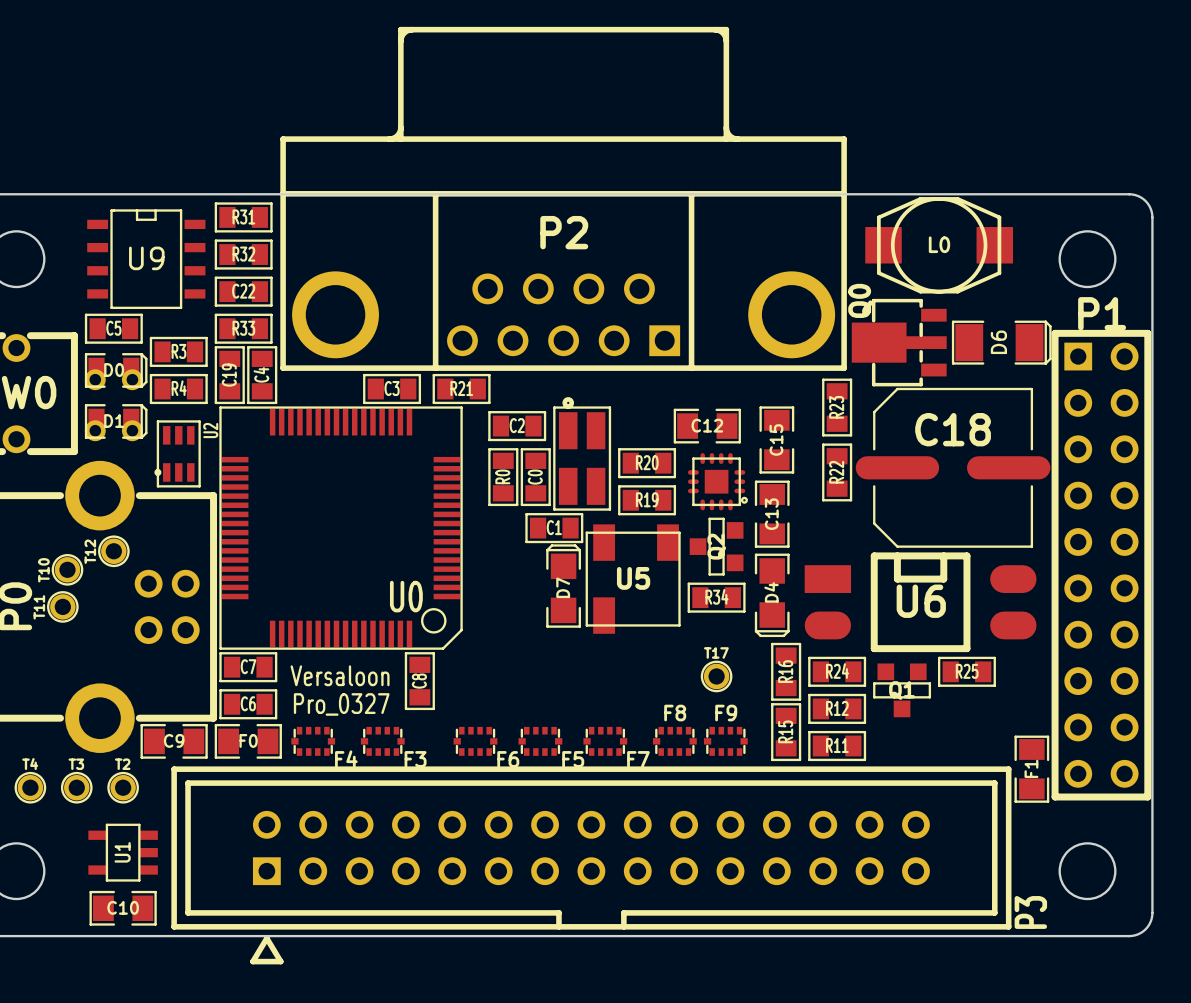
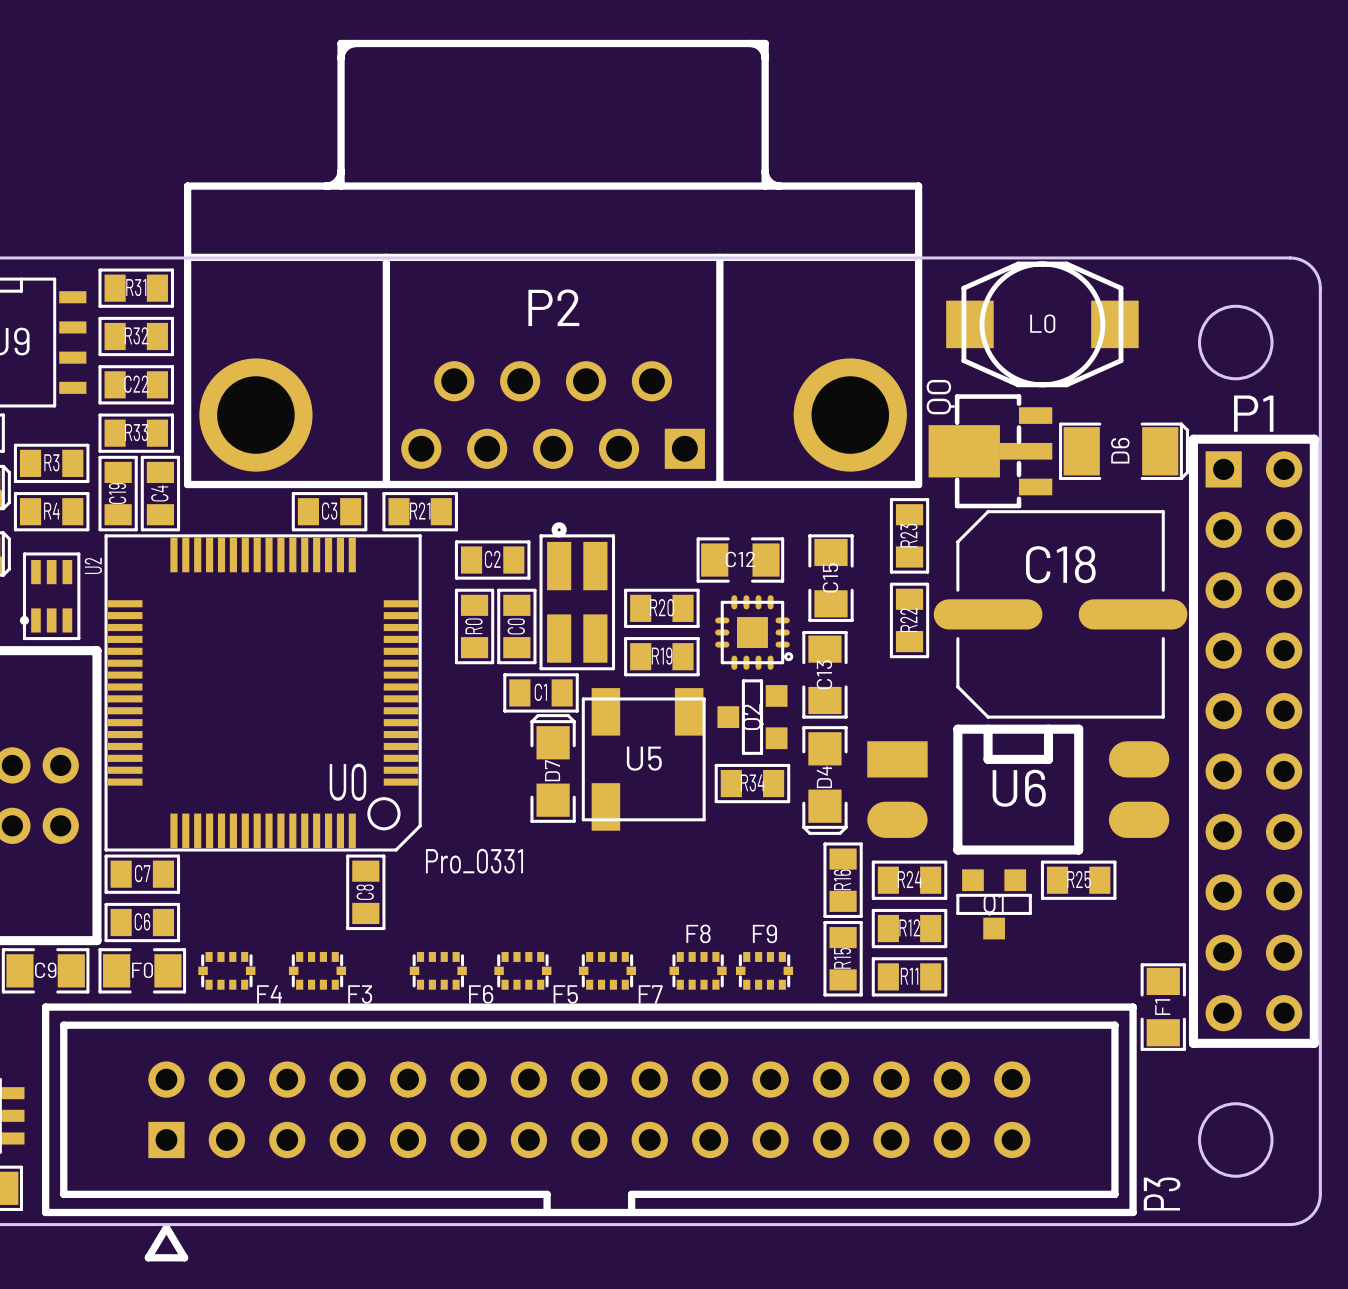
text: none -> Pro_0331 (474, 861)
text: Versaloon (340, 675) -> none
T17: (716, 676) -> none
text: Pro_0327 (341, 704) -> none

